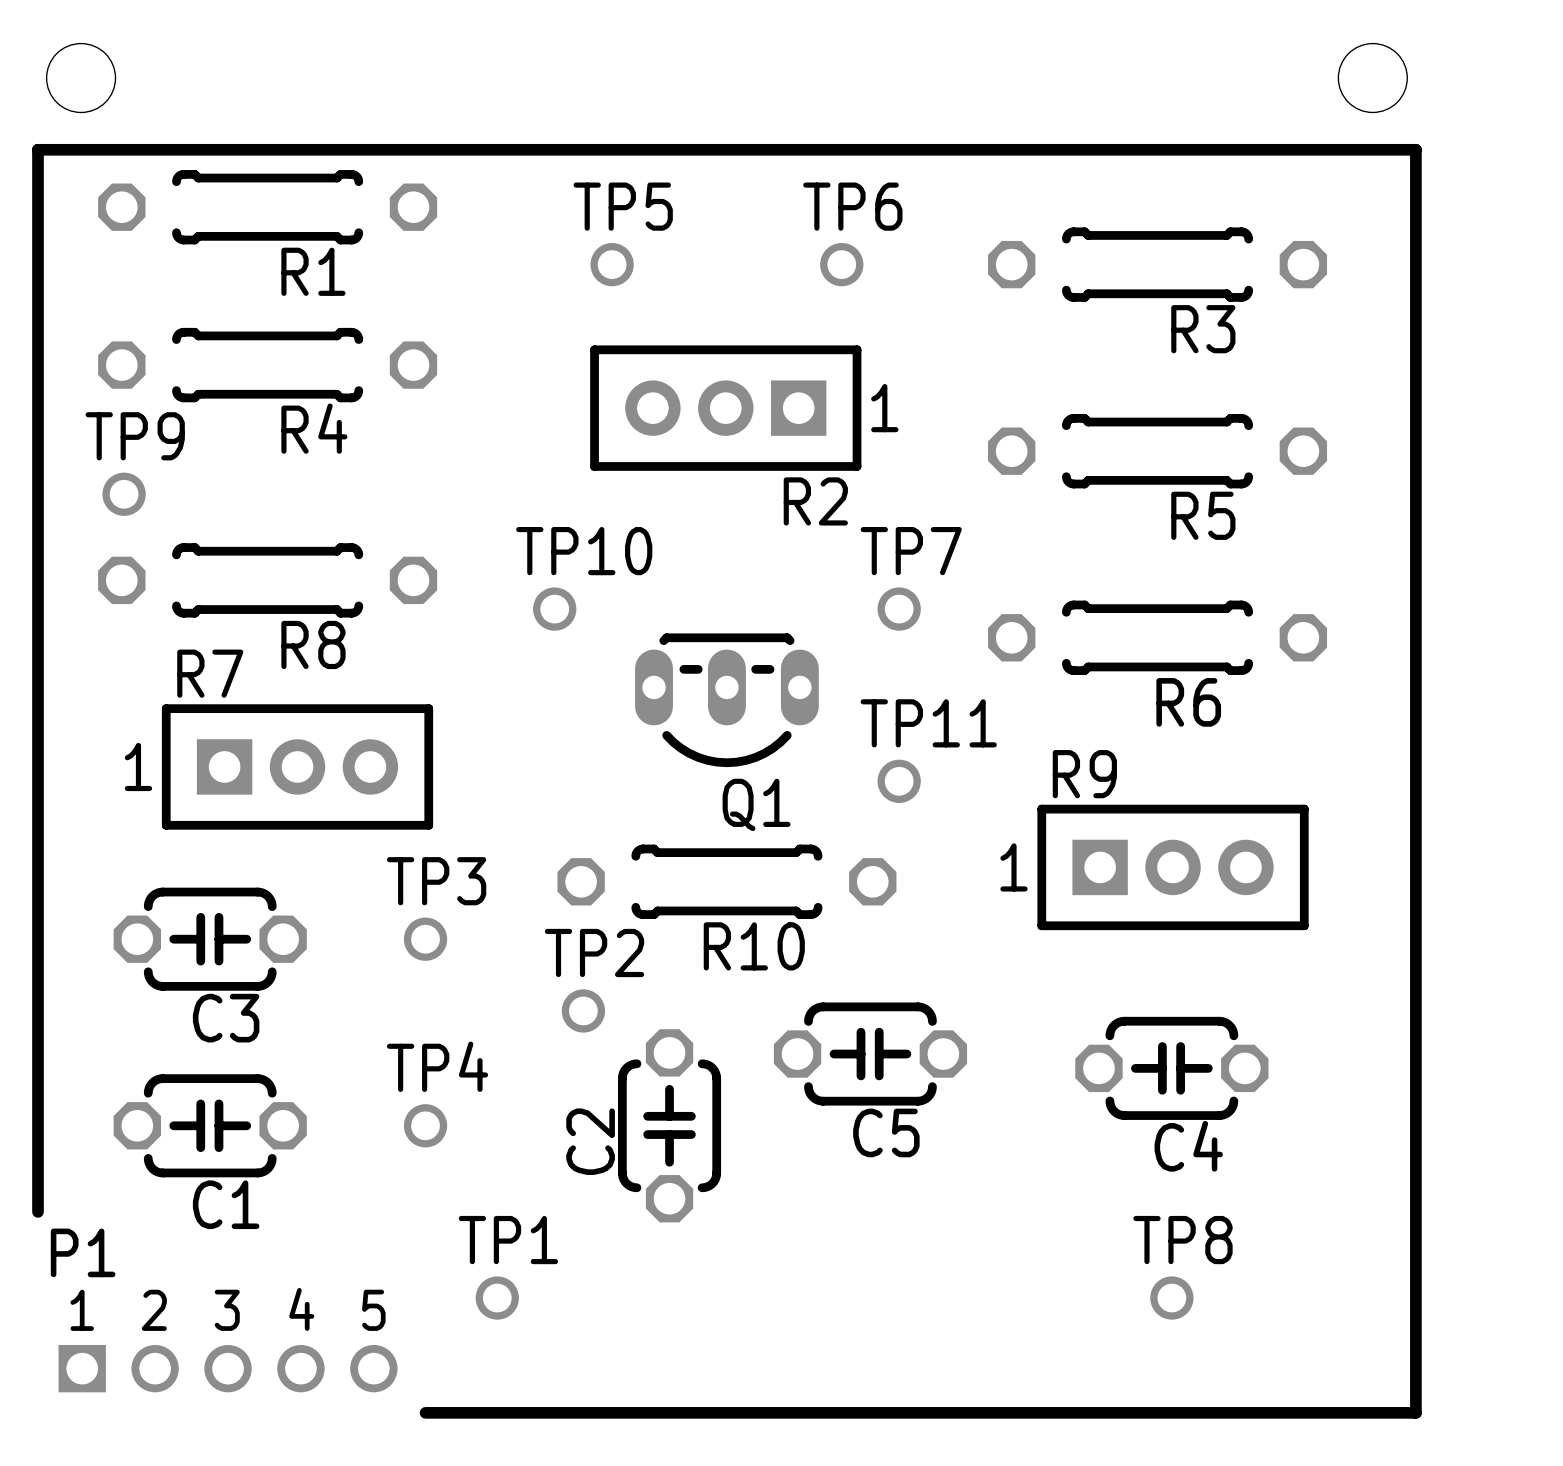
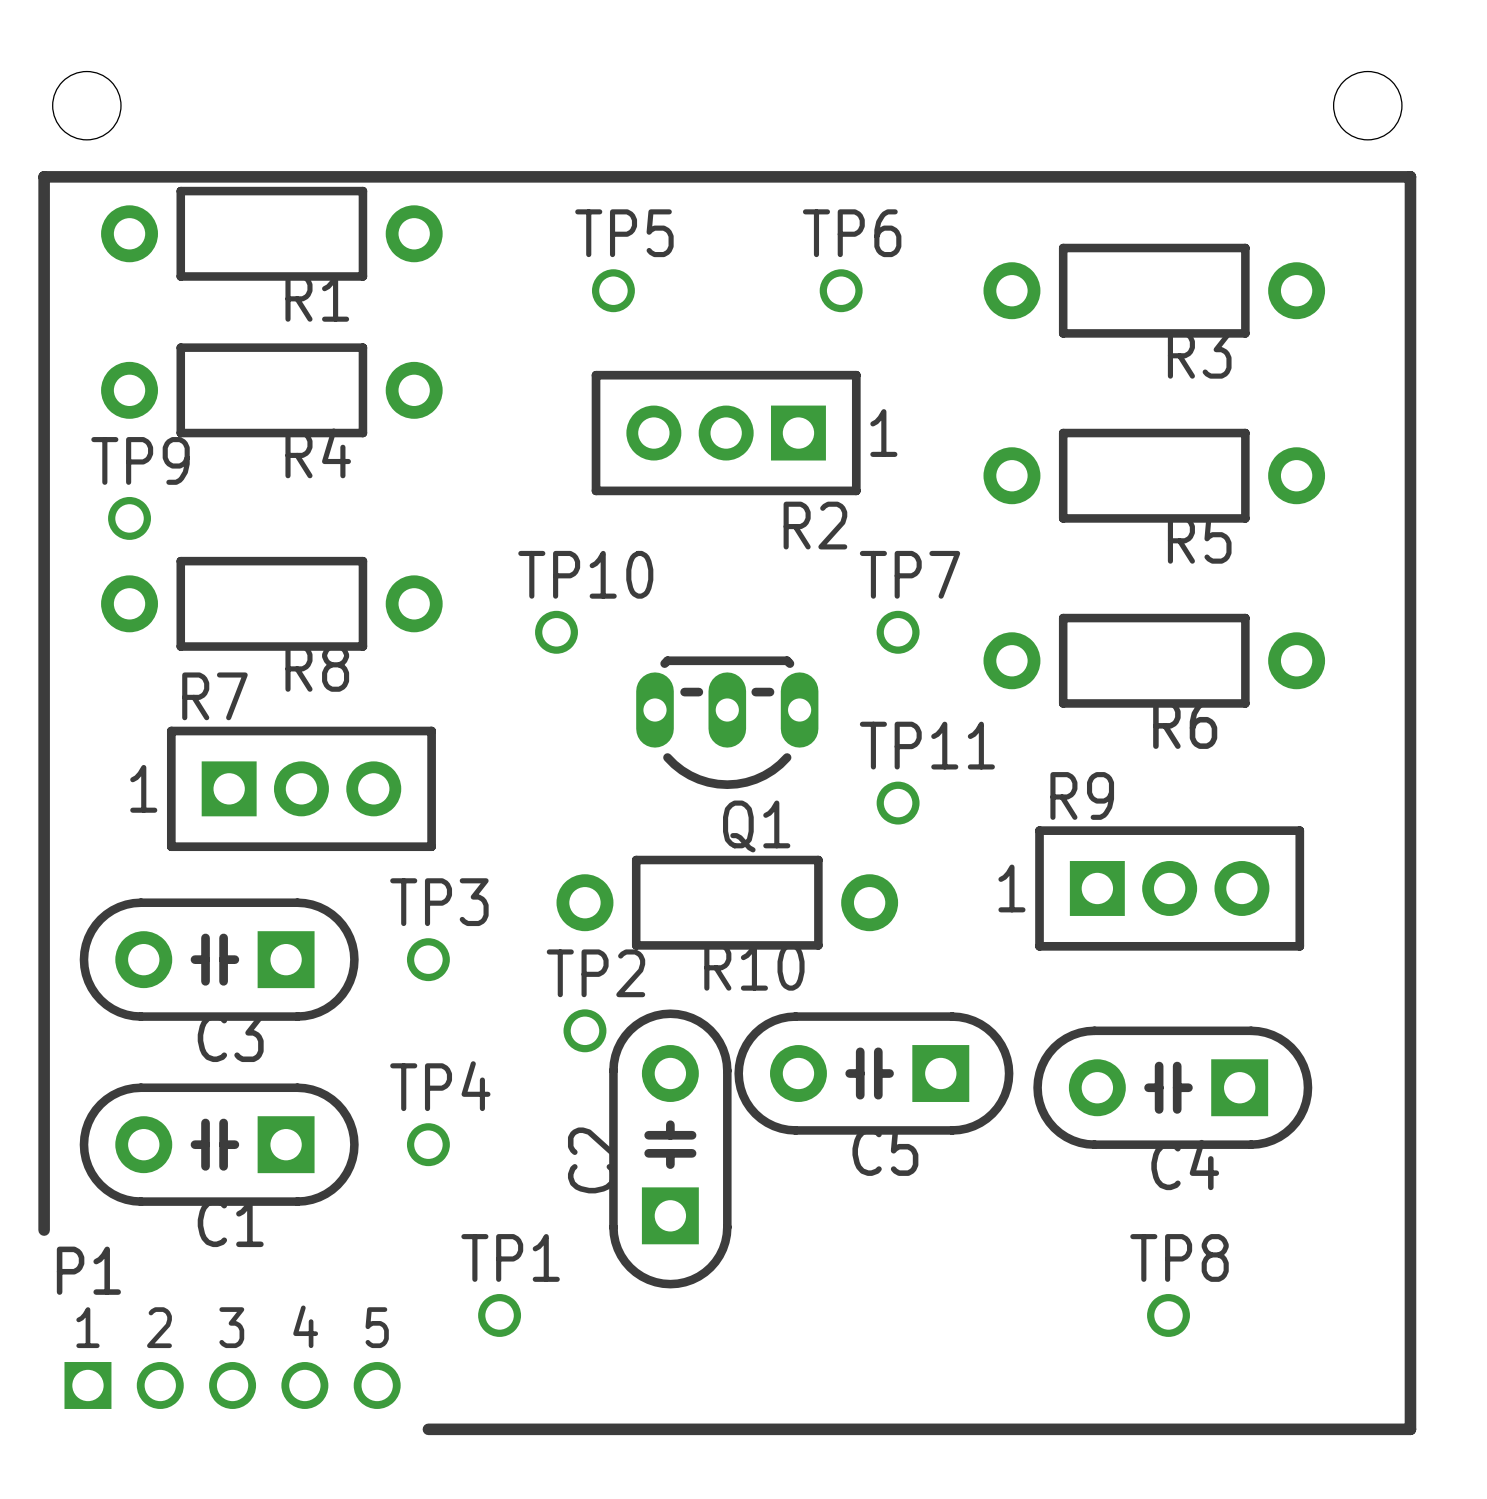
R1 footprint: [98, 170, 438, 245] -> [101, 186, 443, 281]
R3 footprint: [988, 227, 1328, 302] -> [983, 243, 1326, 338]
R4 footprint: [98, 327, 438, 403] -> [101, 343, 443, 438]
R5 footprint: [988, 414, 1328, 489] -> [983, 428, 1326, 523]
R8 footprint: [98, 543, 438, 618] -> [101, 556, 443, 651]
R6 footprint: [988, 600, 1328, 675] -> [983, 613, 1326, 708]
R10 footprint: [557, 844, 897, 919] -> [556, 855, 899, 950]
C3 footprint: [113, 887, 307, 991] -> [79, 898, 359, 1021]
C5 footprint: [773, 1002, 968, 1106] -> [734, 1012, 1014, 1135]
C4 footprint: [1075, 1016, 1269, 1120] -> [1033, 1026, 1313, 1149]
C2 footprint: [617, 1029, 722, 1223] -> [609, 1009, 732, 1289]
C1 footprint: [113, 1074, 307, 1178] -> [79, 1083, 359, 1206]

